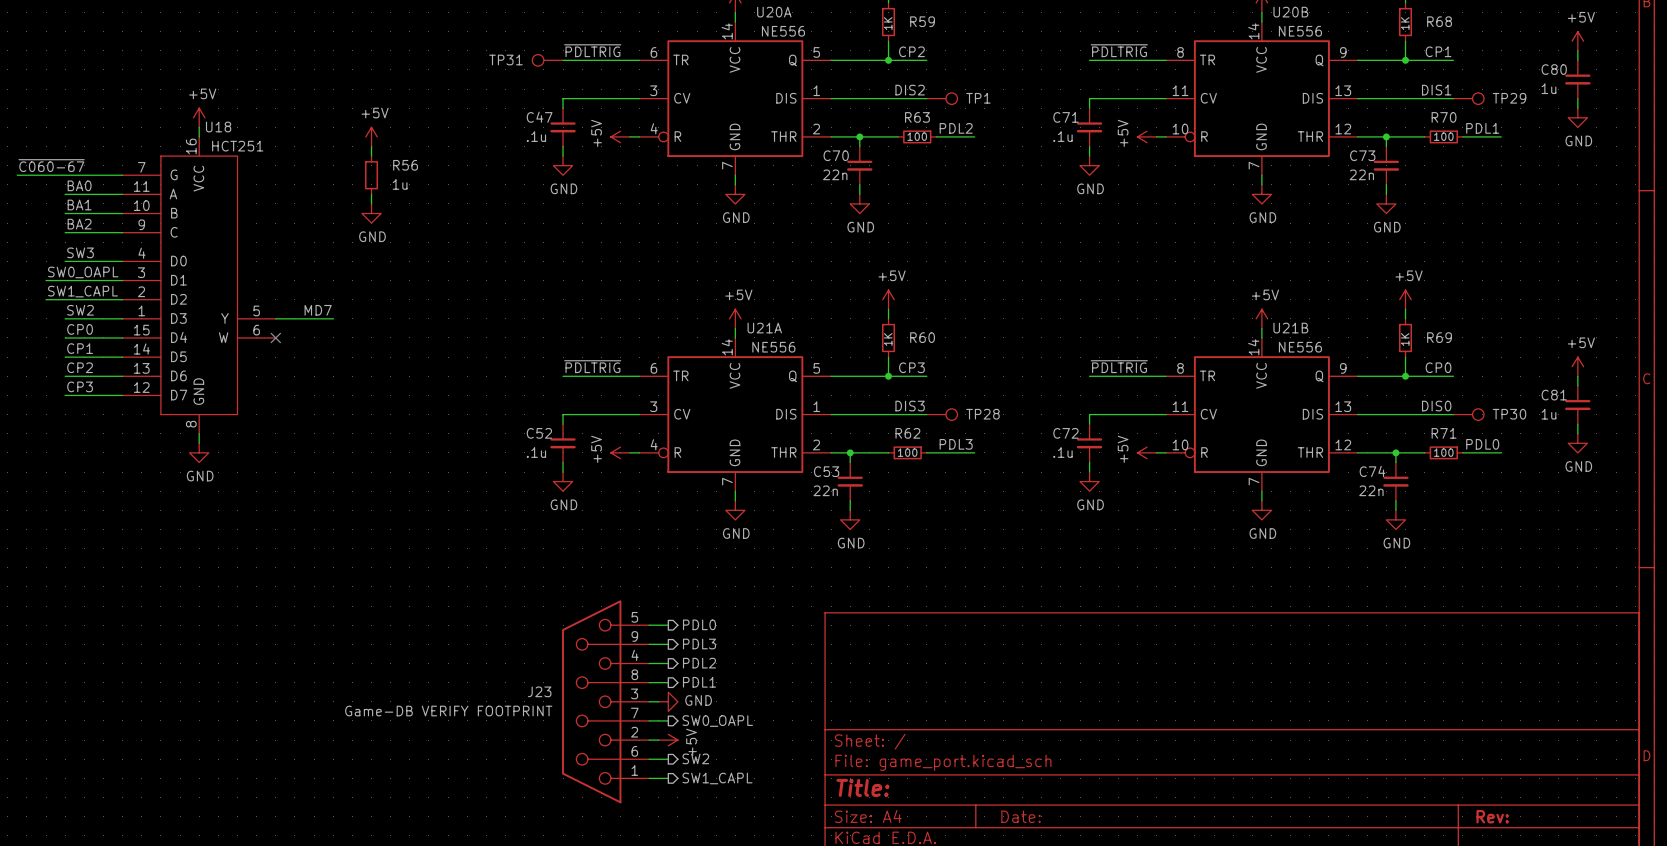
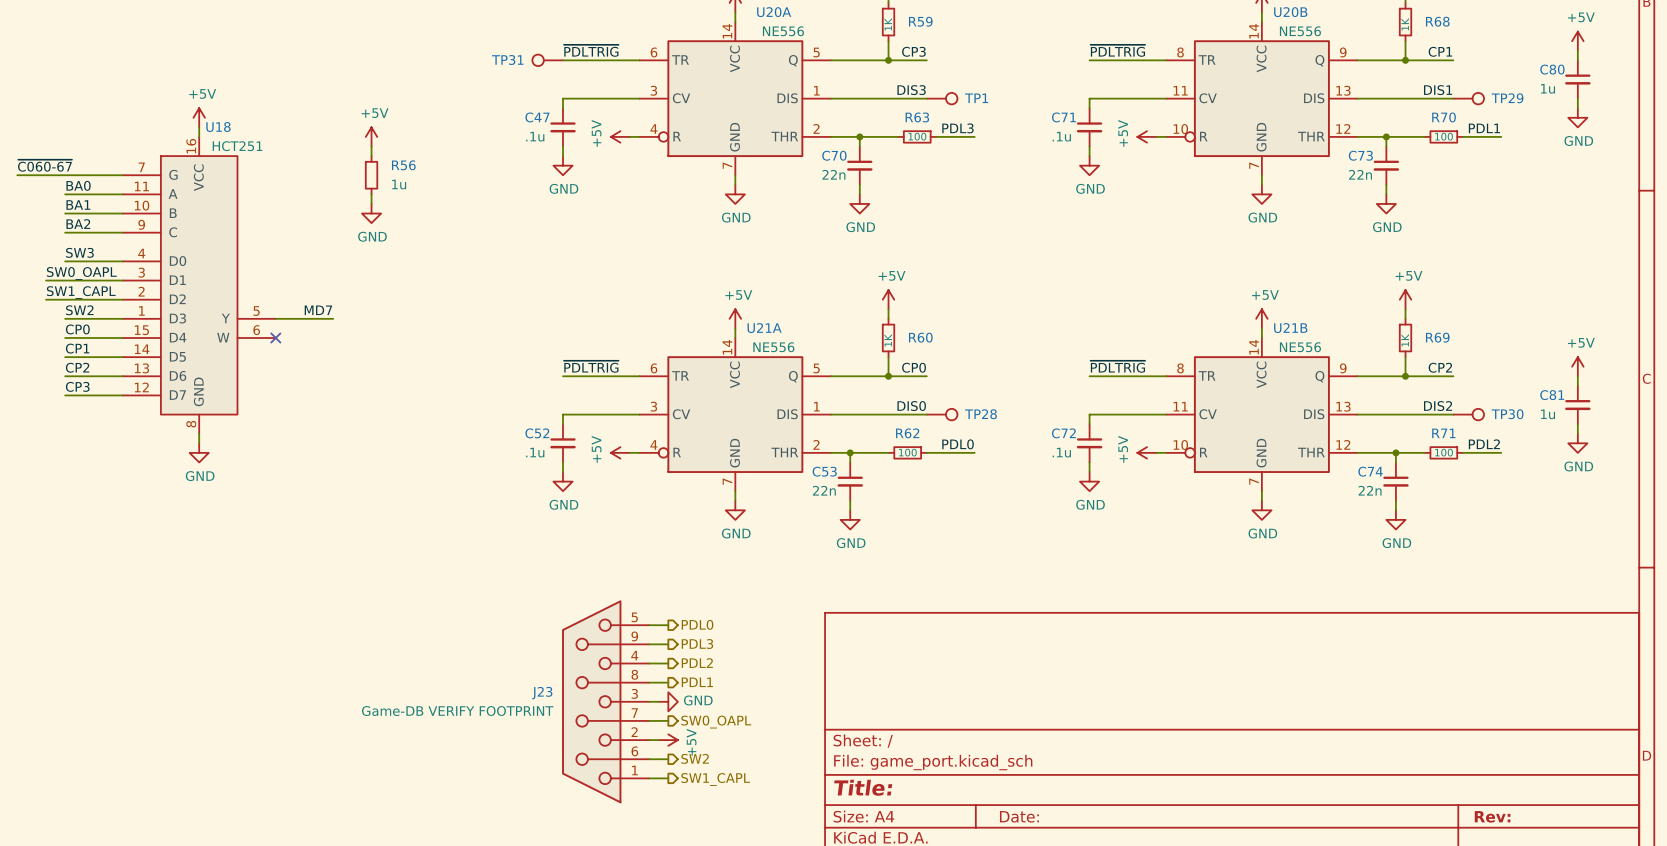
label: CP2 (911, 51) -> CP3 (913, 51)
label: DIS2 (910, 90) -> DIS3 (911, 90)
label: PDL2 (956, 128) -> PDL3 (957, 128)
label: CP3 (911, 367) -> CP0 (914, 367)
label: CP0 (1438, 367) -> CP2 (1440, 367)
label: DIS3 (910, 406) -> DIS0 (911, 406)
label: DIS0 (1436, 406) -> DIS2 (1438, 406)
label: PDL3 (956, 444) -> PDL0 (958, 444)
label: PDL0 (1482, 444) -> PDL2 (1484, 444)

